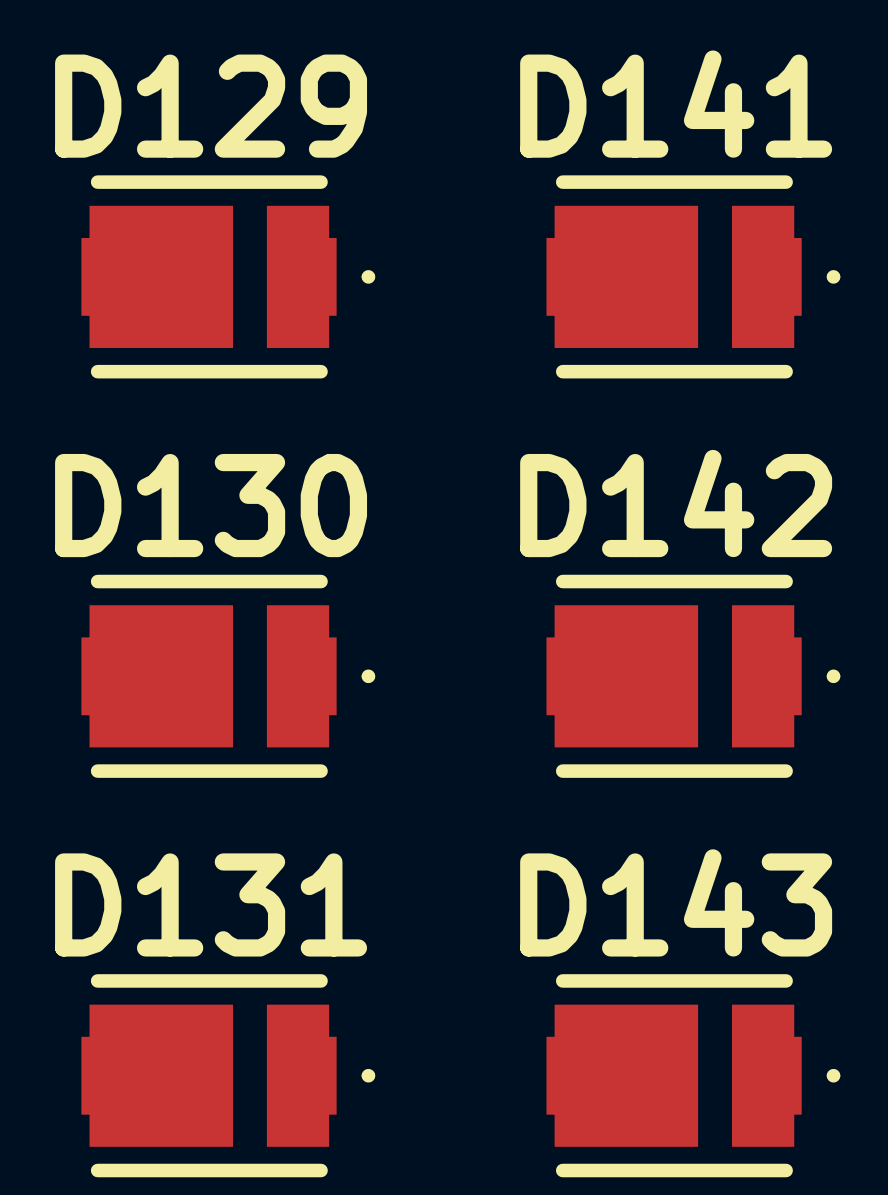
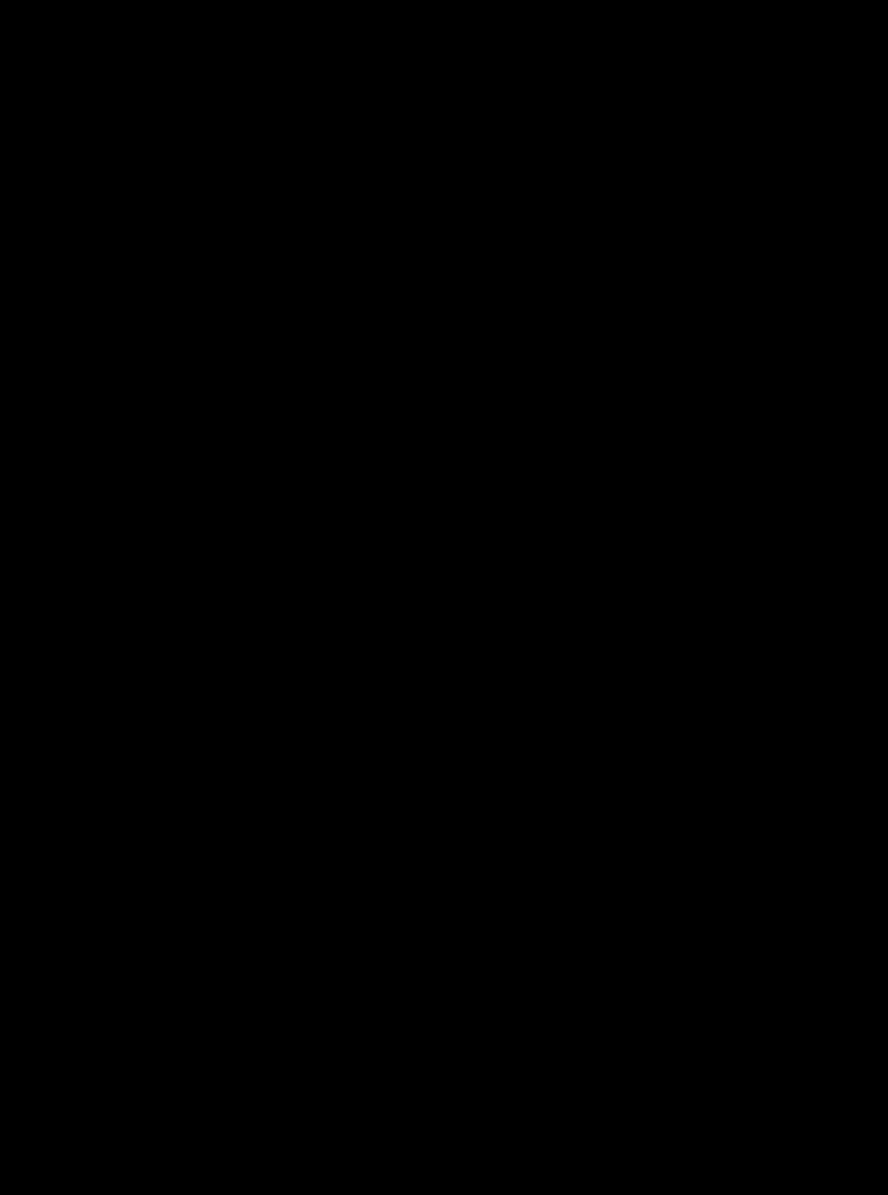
D129: (228, 276) -> none
D141: (693, 276) -> none
D130: (228, 676) -> none
D142: (693, 676) -> none
D131: (228, 1075) -> none
D143: (693, 1075) -> none

